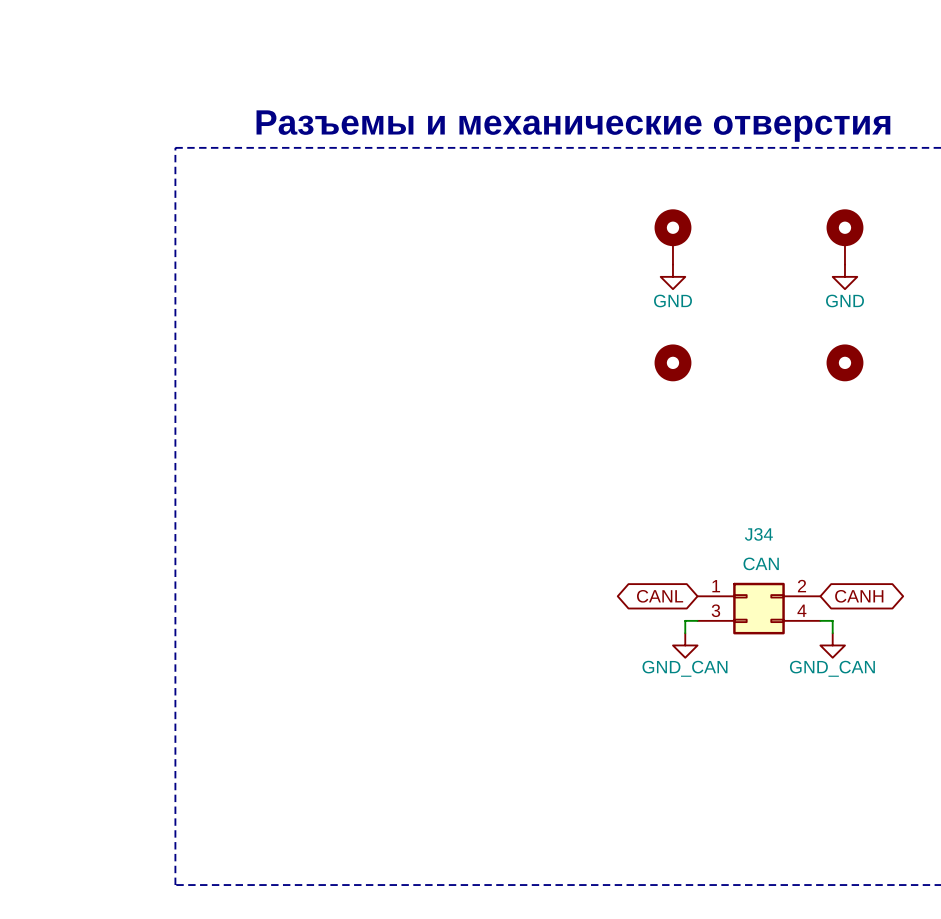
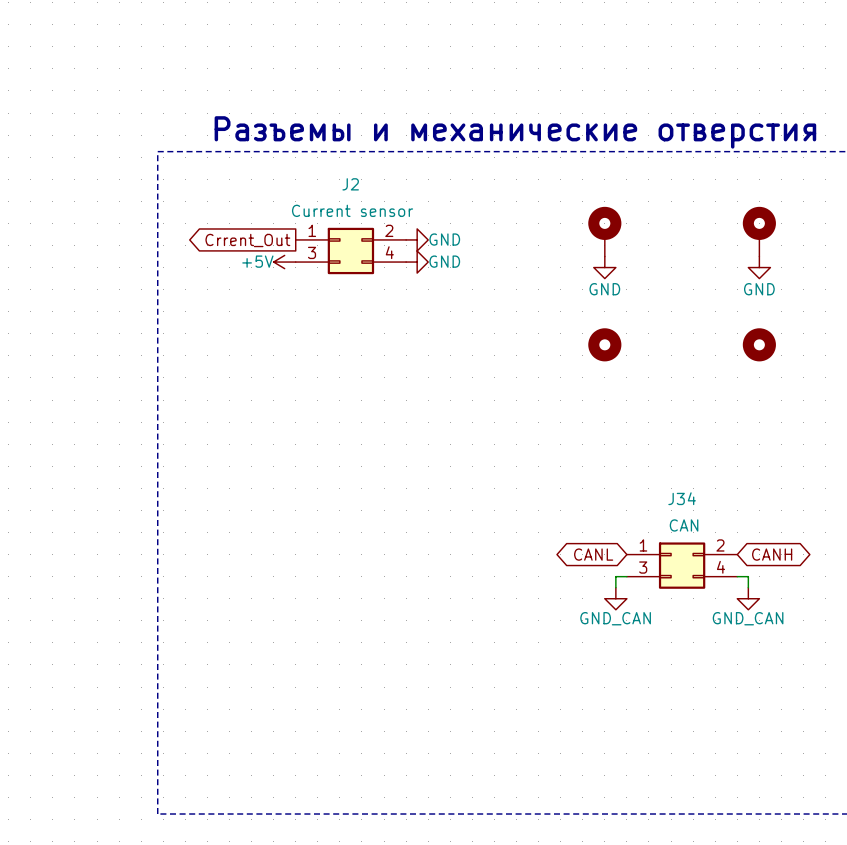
power symbol: none -> GND (417, 239)
global label: none -> Crrent_Out (247, 240)
J2: none -> (350, 250)
power symbol: none -> +5V (284, 262)
power symbol: none -> GND (417, 262)

